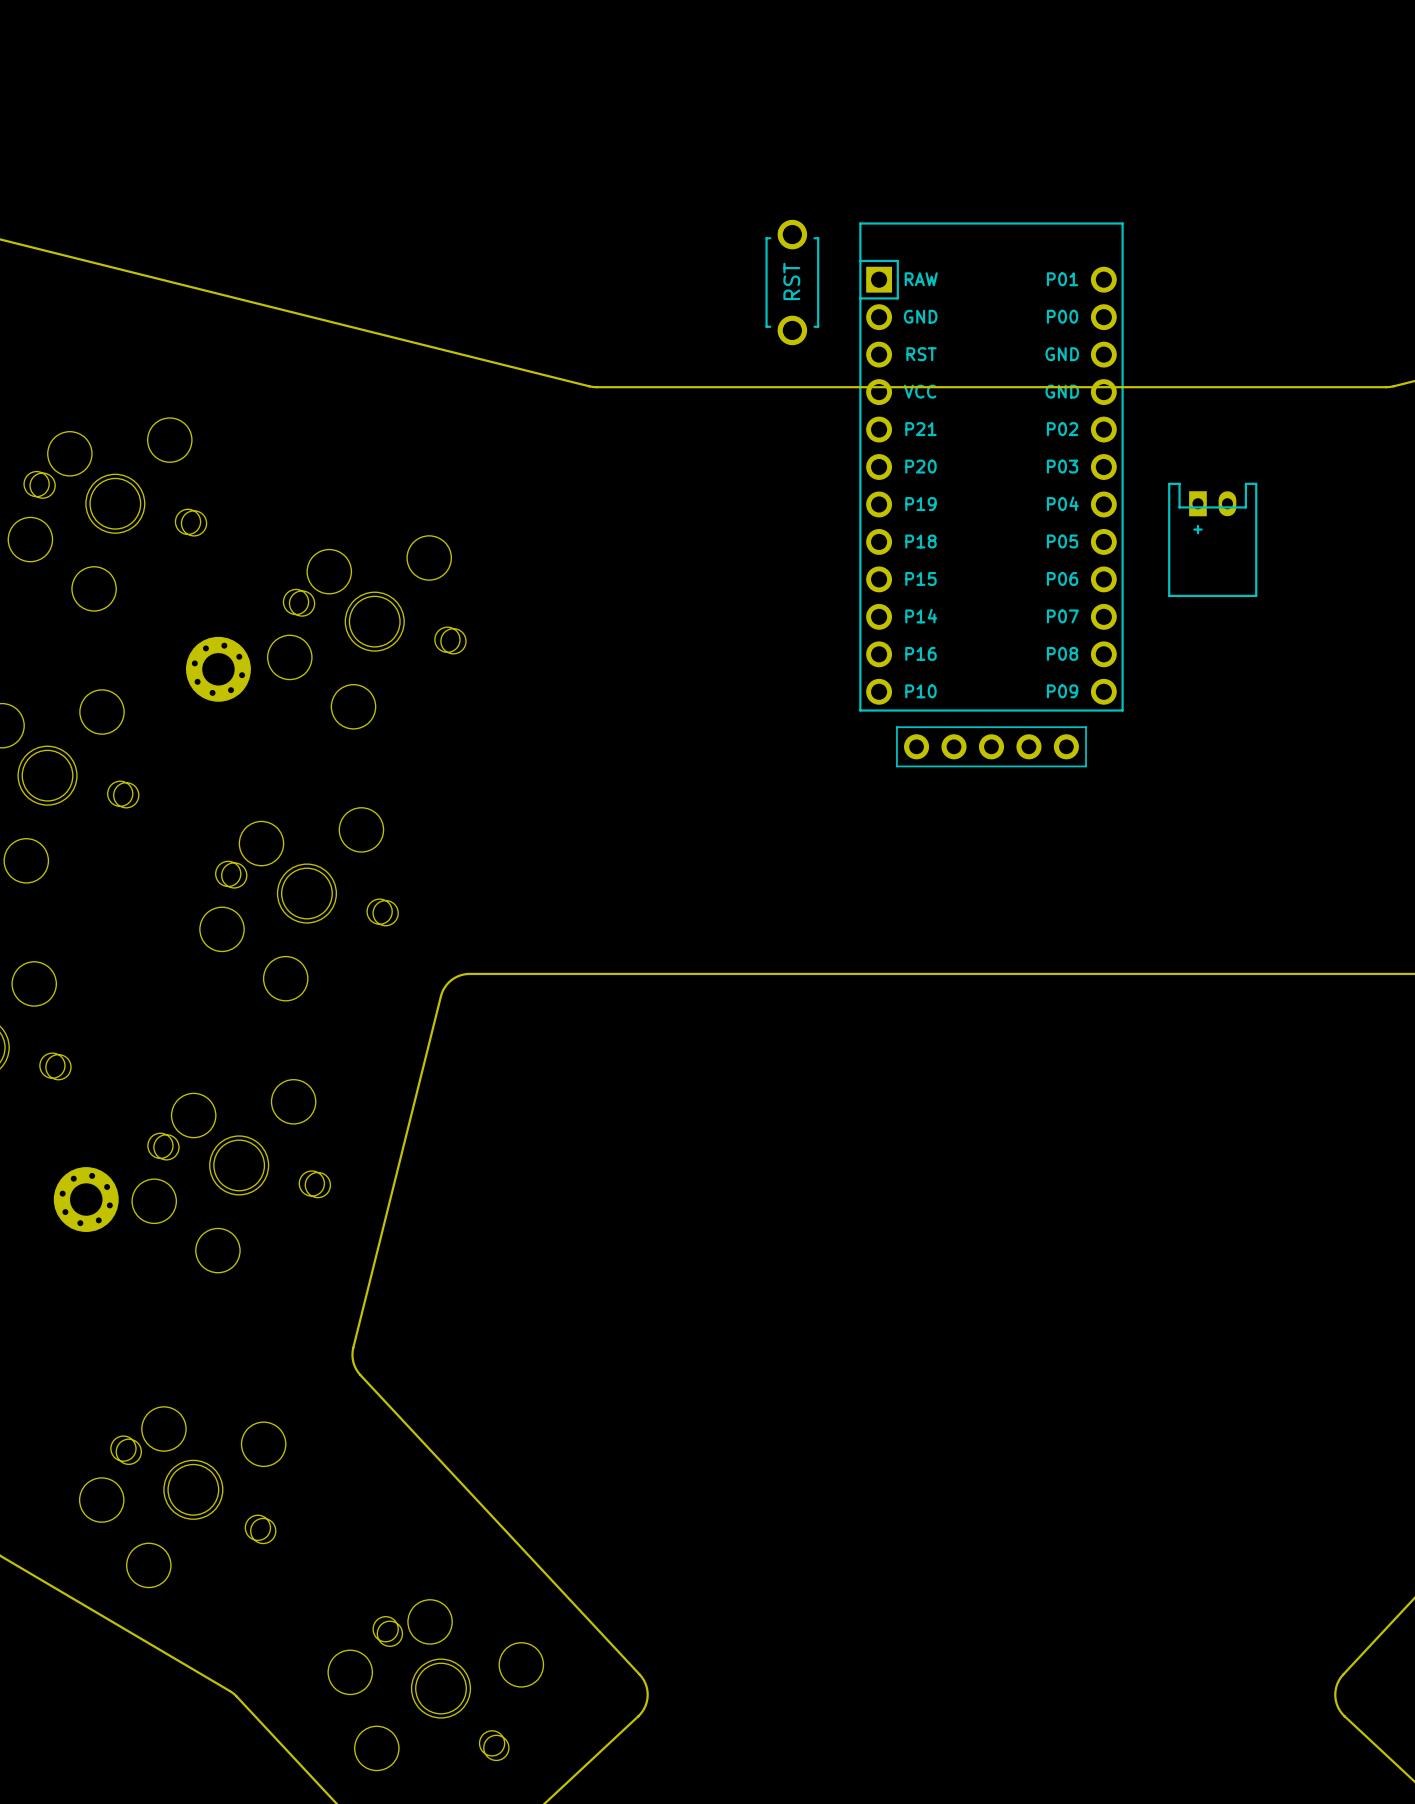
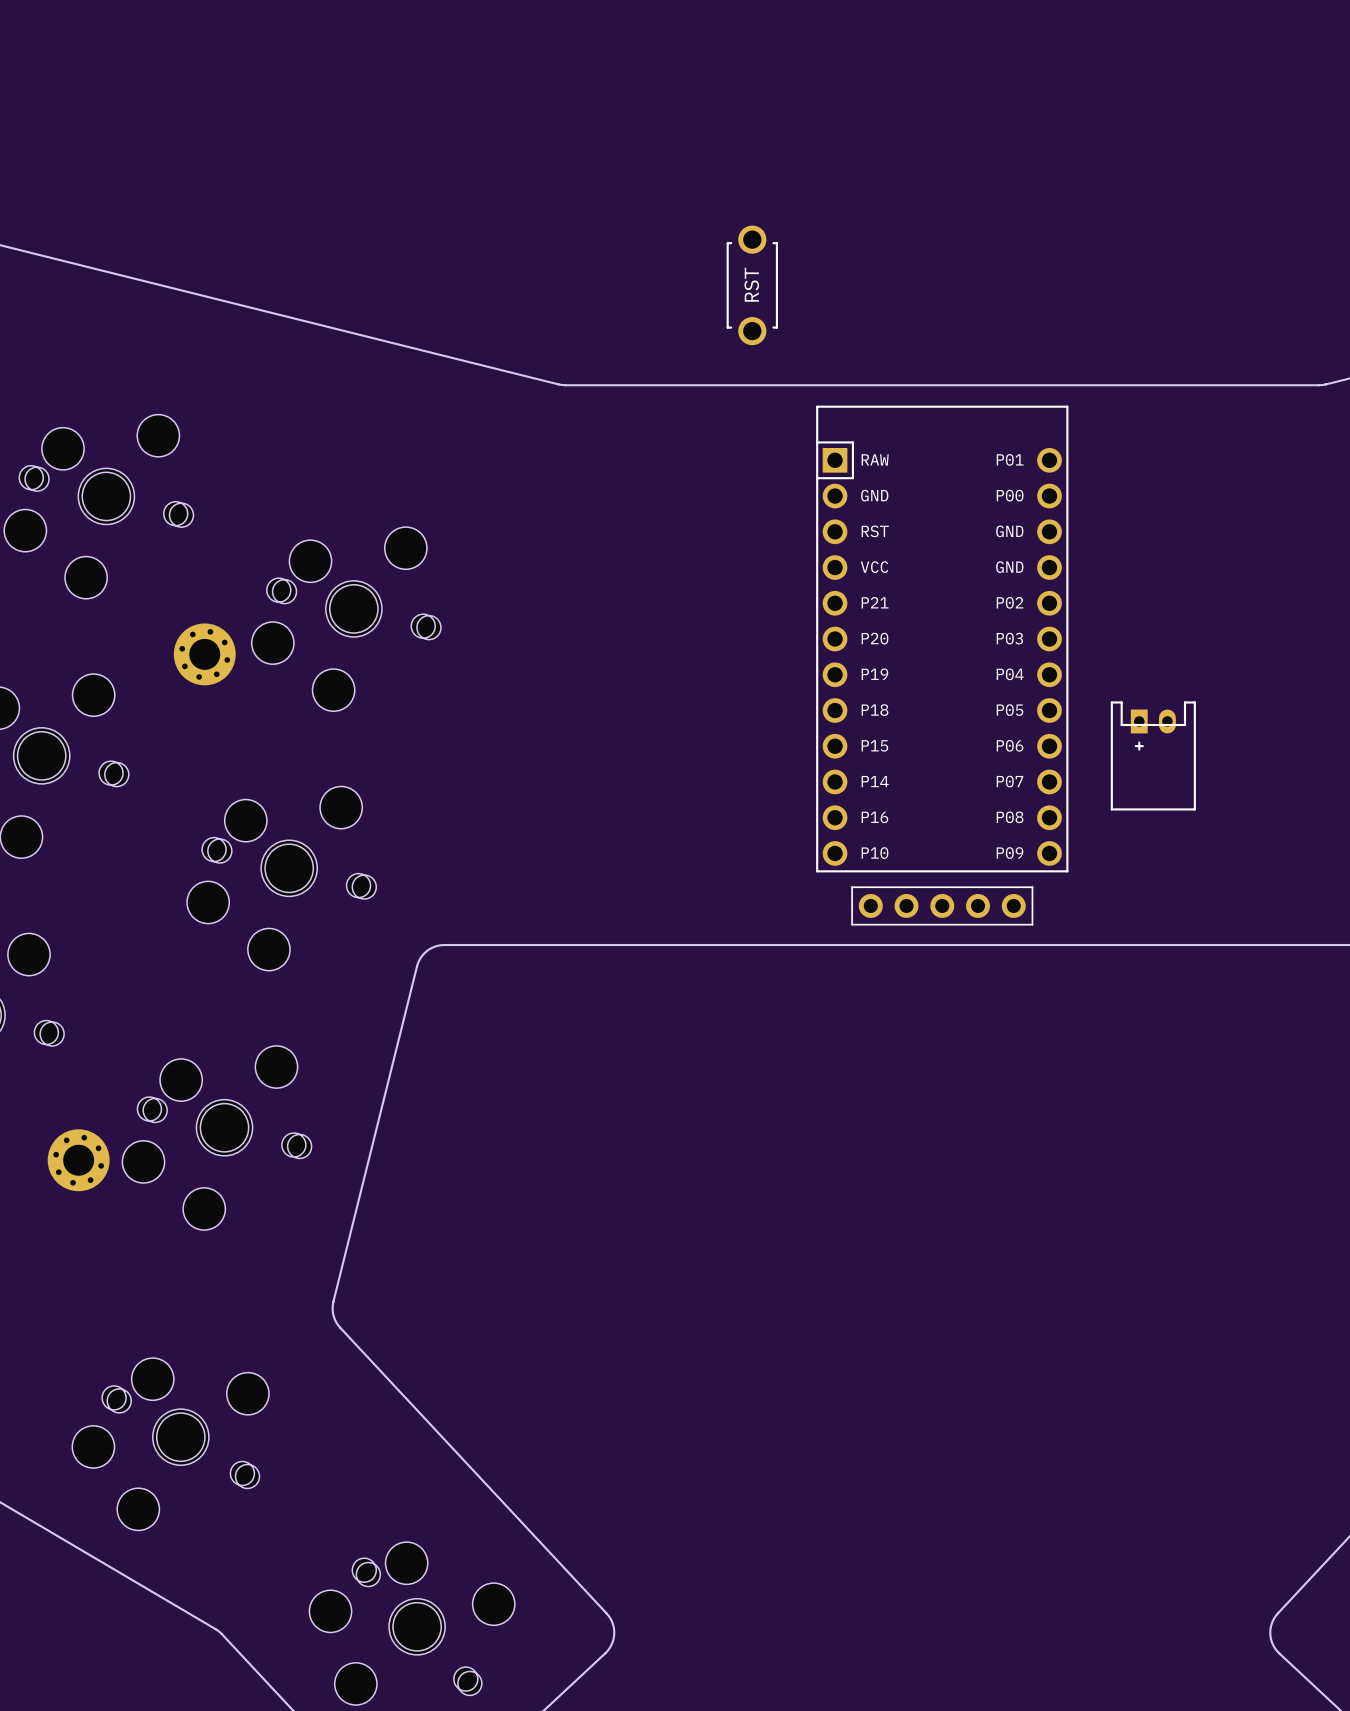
part position: (991, 467) -> (942, 639)
part position: (1212, 539) -> (1153, 755)
part position: (991, 746) -> (942, 905)

